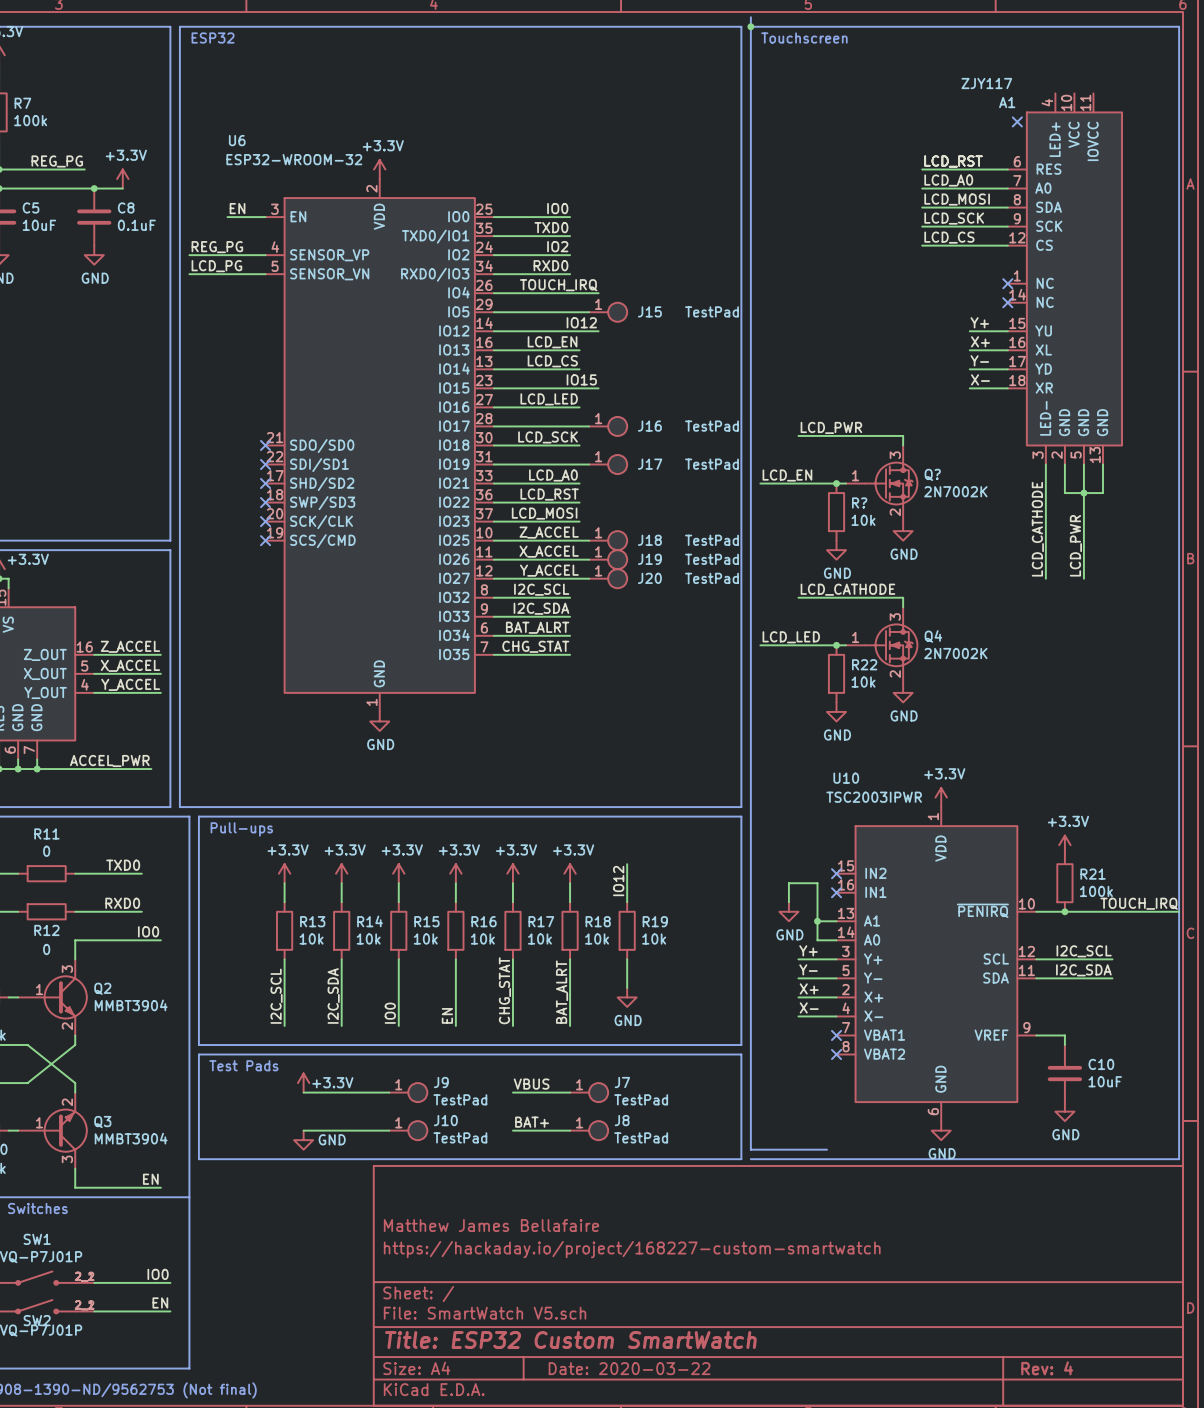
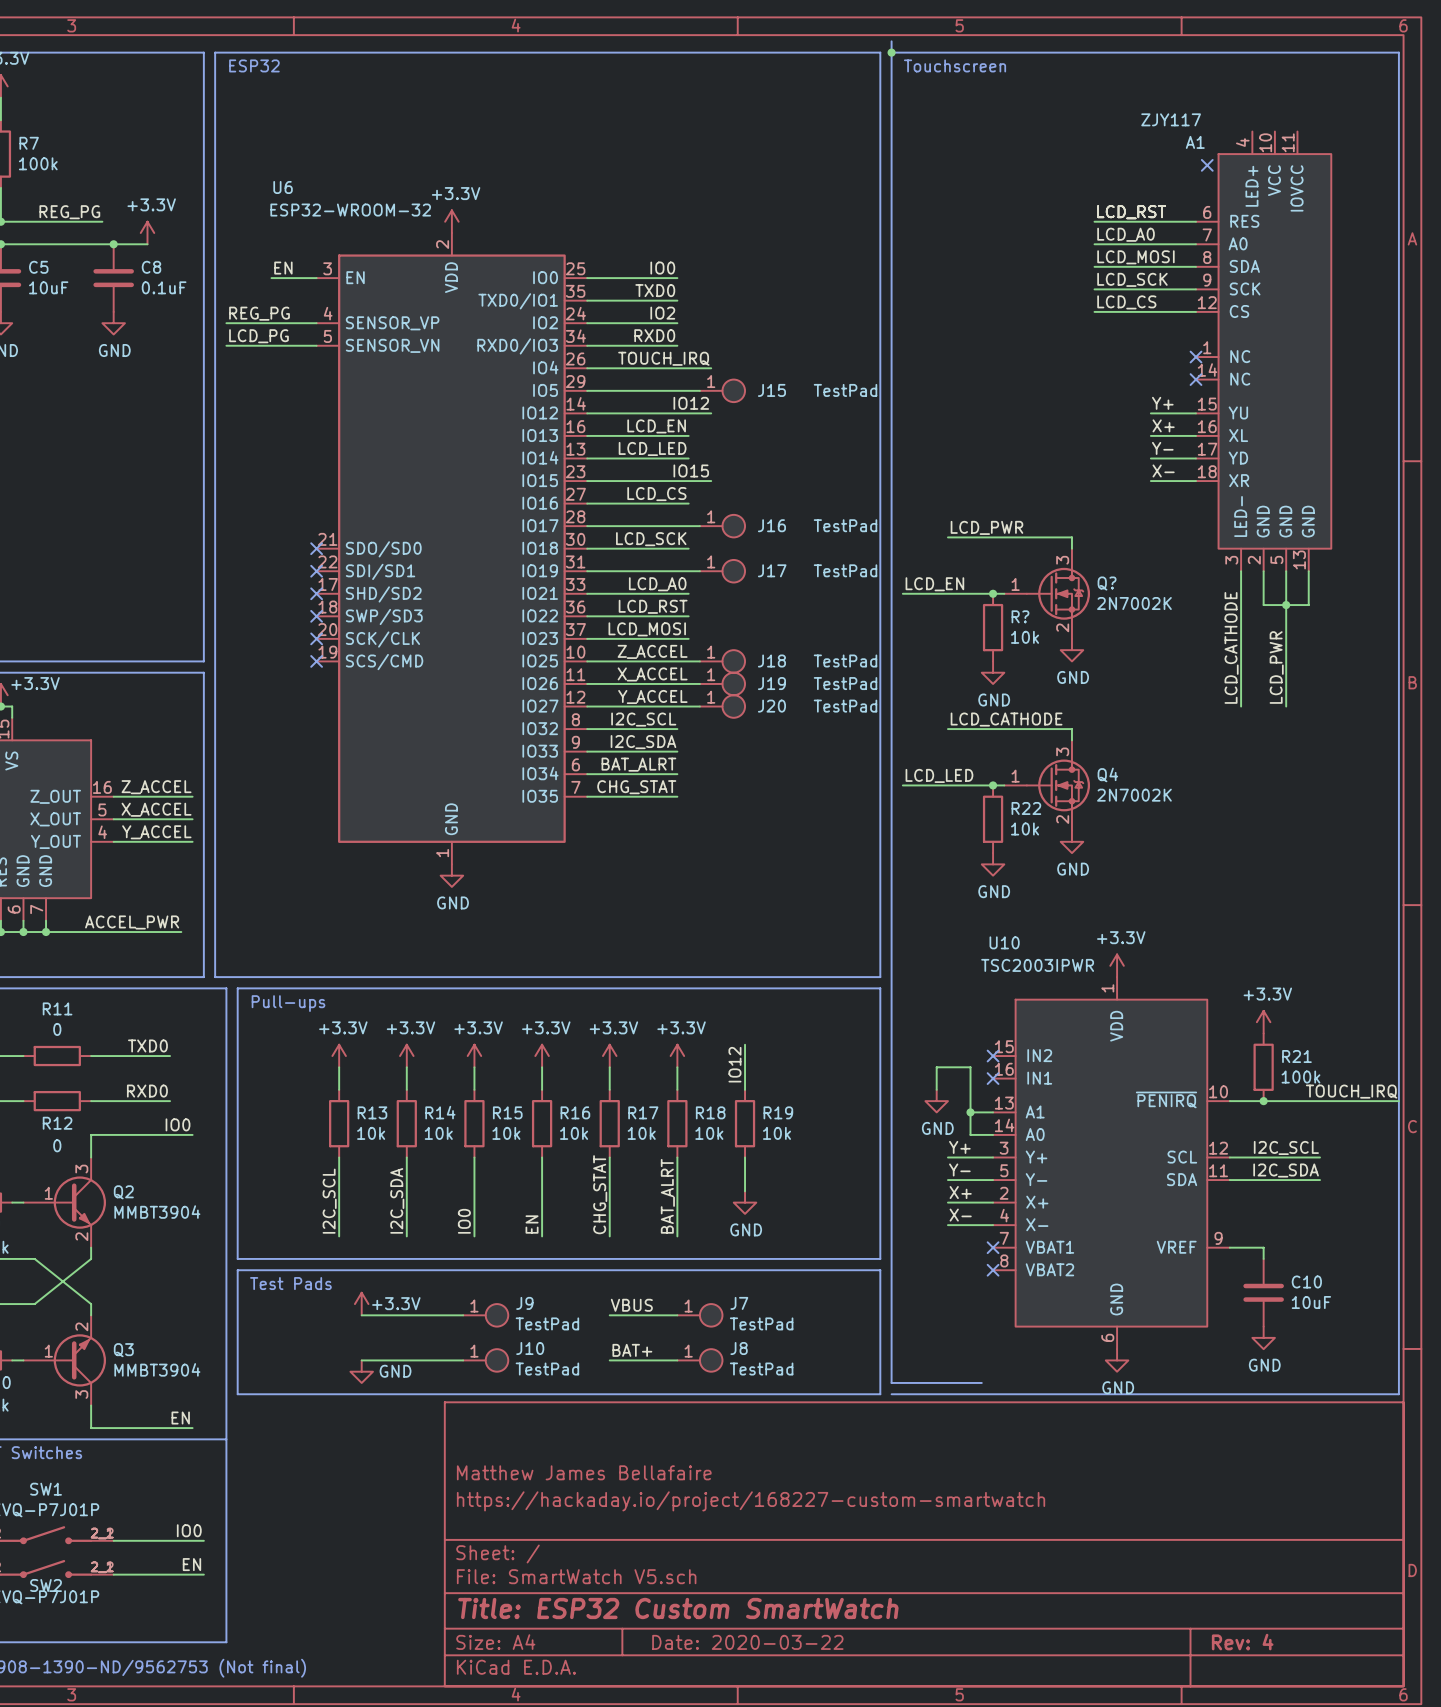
label: LCD_CS (552, 361) -> LCD_LED (652, 448)
label: LCD_LED (549, 399) -> LCD_CS (656, 494)

